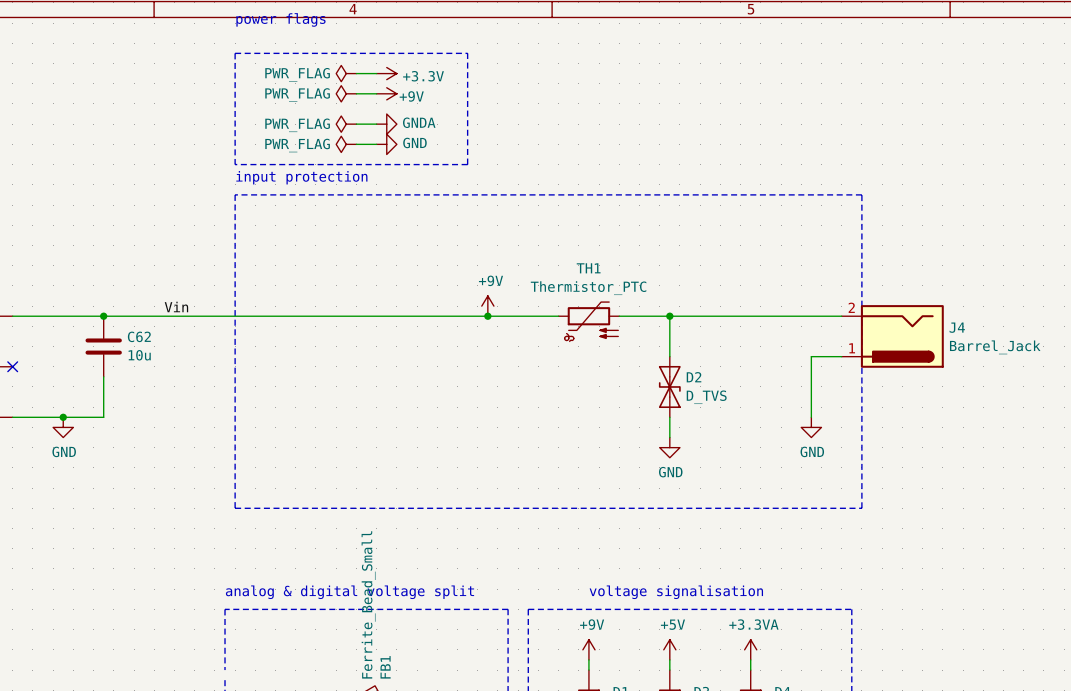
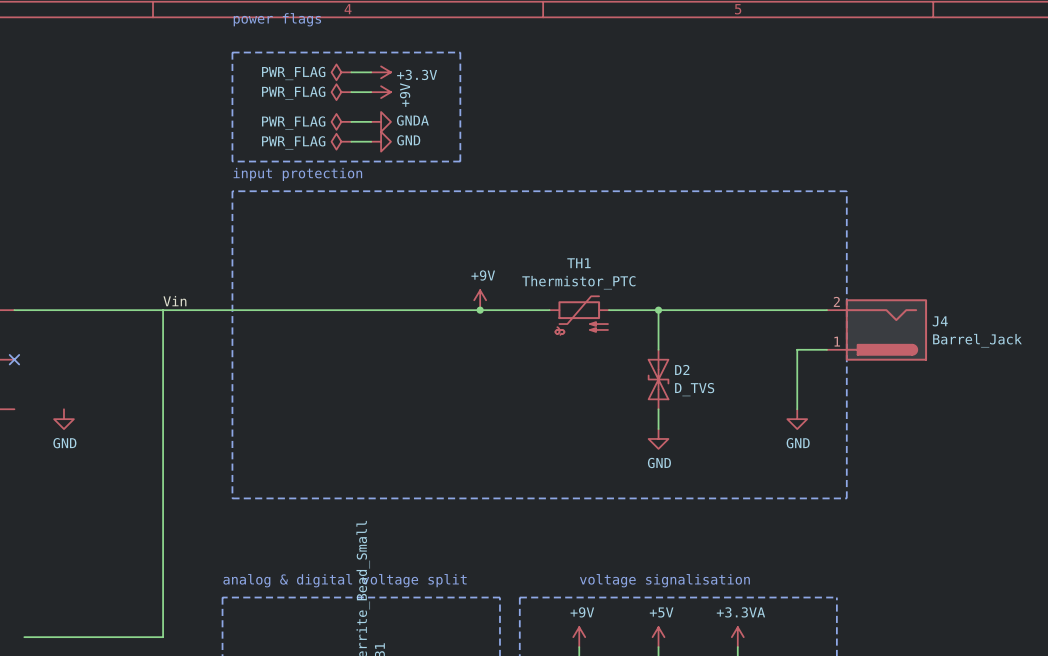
power symbol text rotation: 0° (411, 96) -> 90° counterclockwise (405, 95)
junction: (103, 316) -> none
wire: none -> (163, 310) (163, 637) (24, 637)
C62: 10u (103, 346) -> none
wire: (103, 376) (103, 417) (12, 417) -> none
junction: (63, 417) -> none

